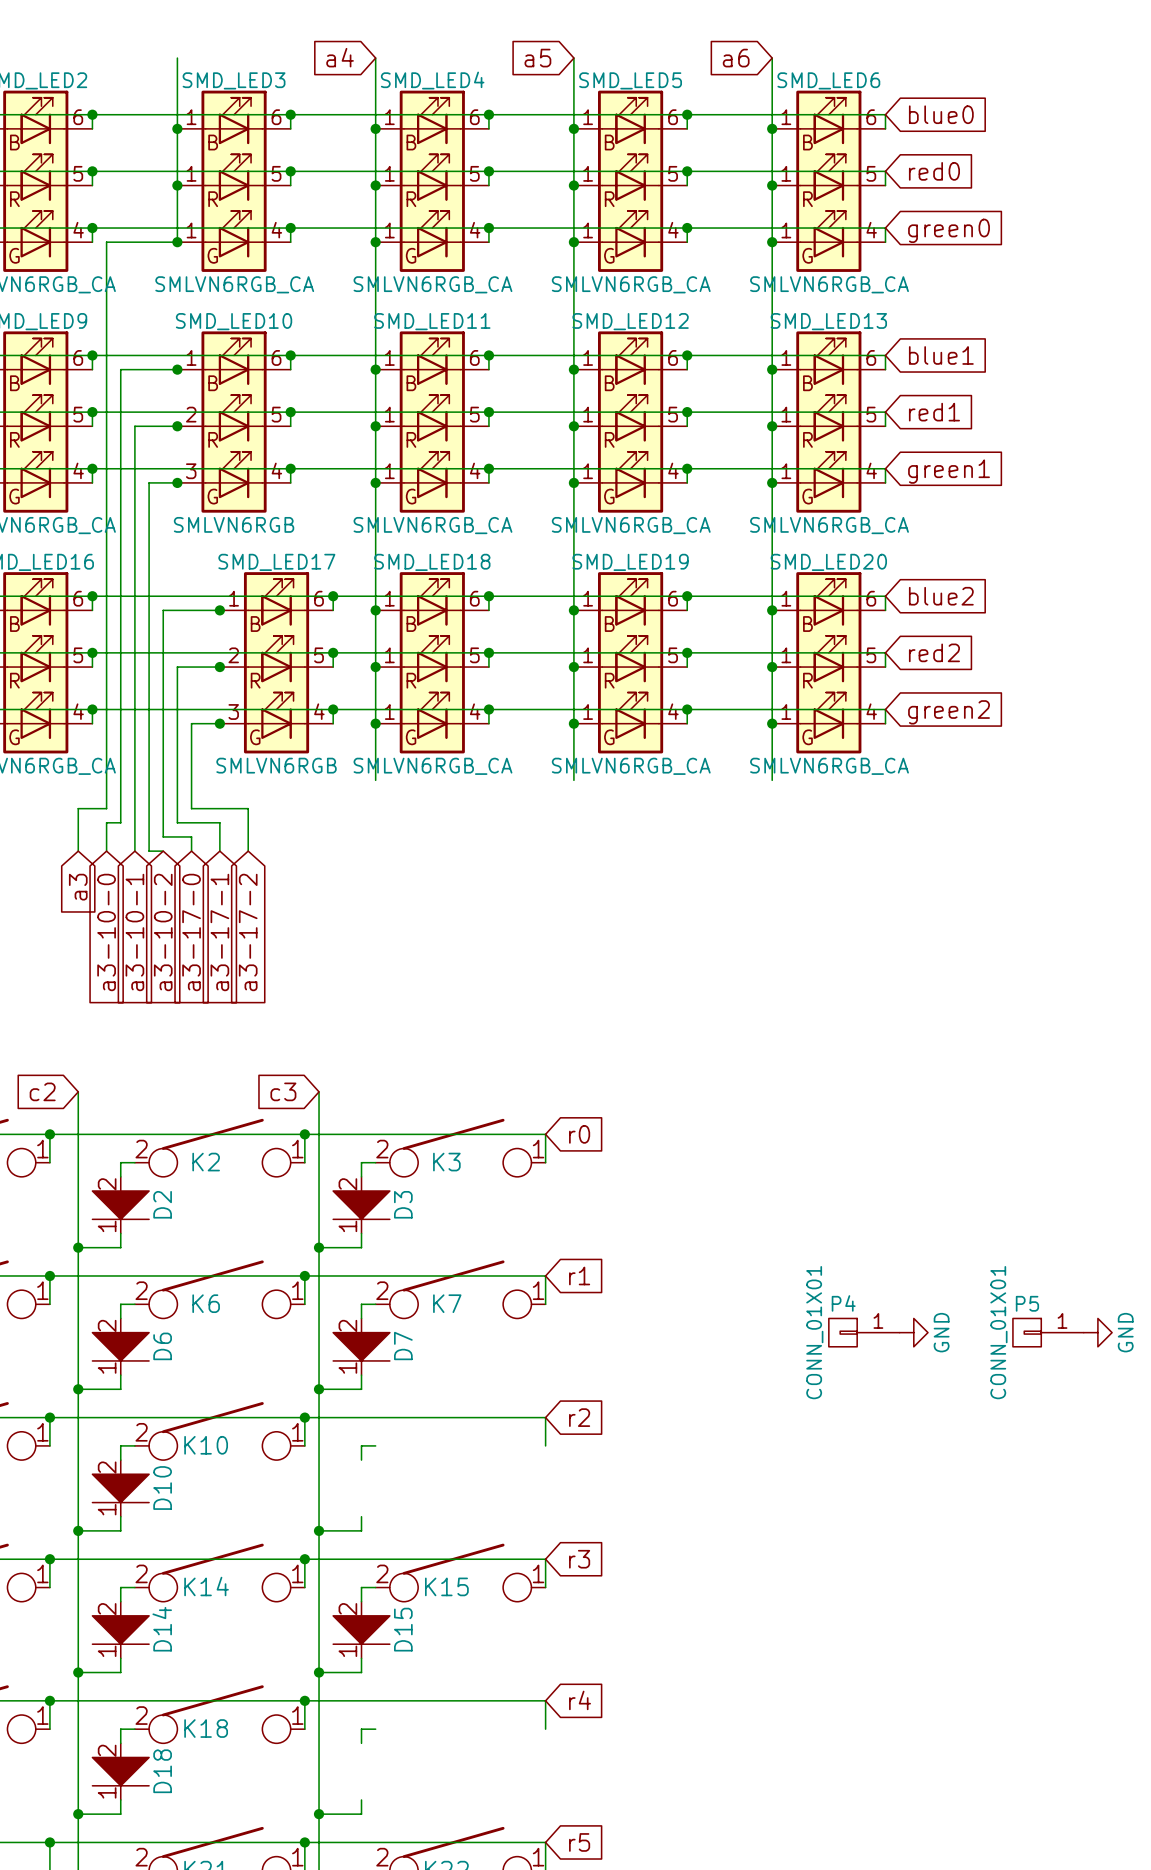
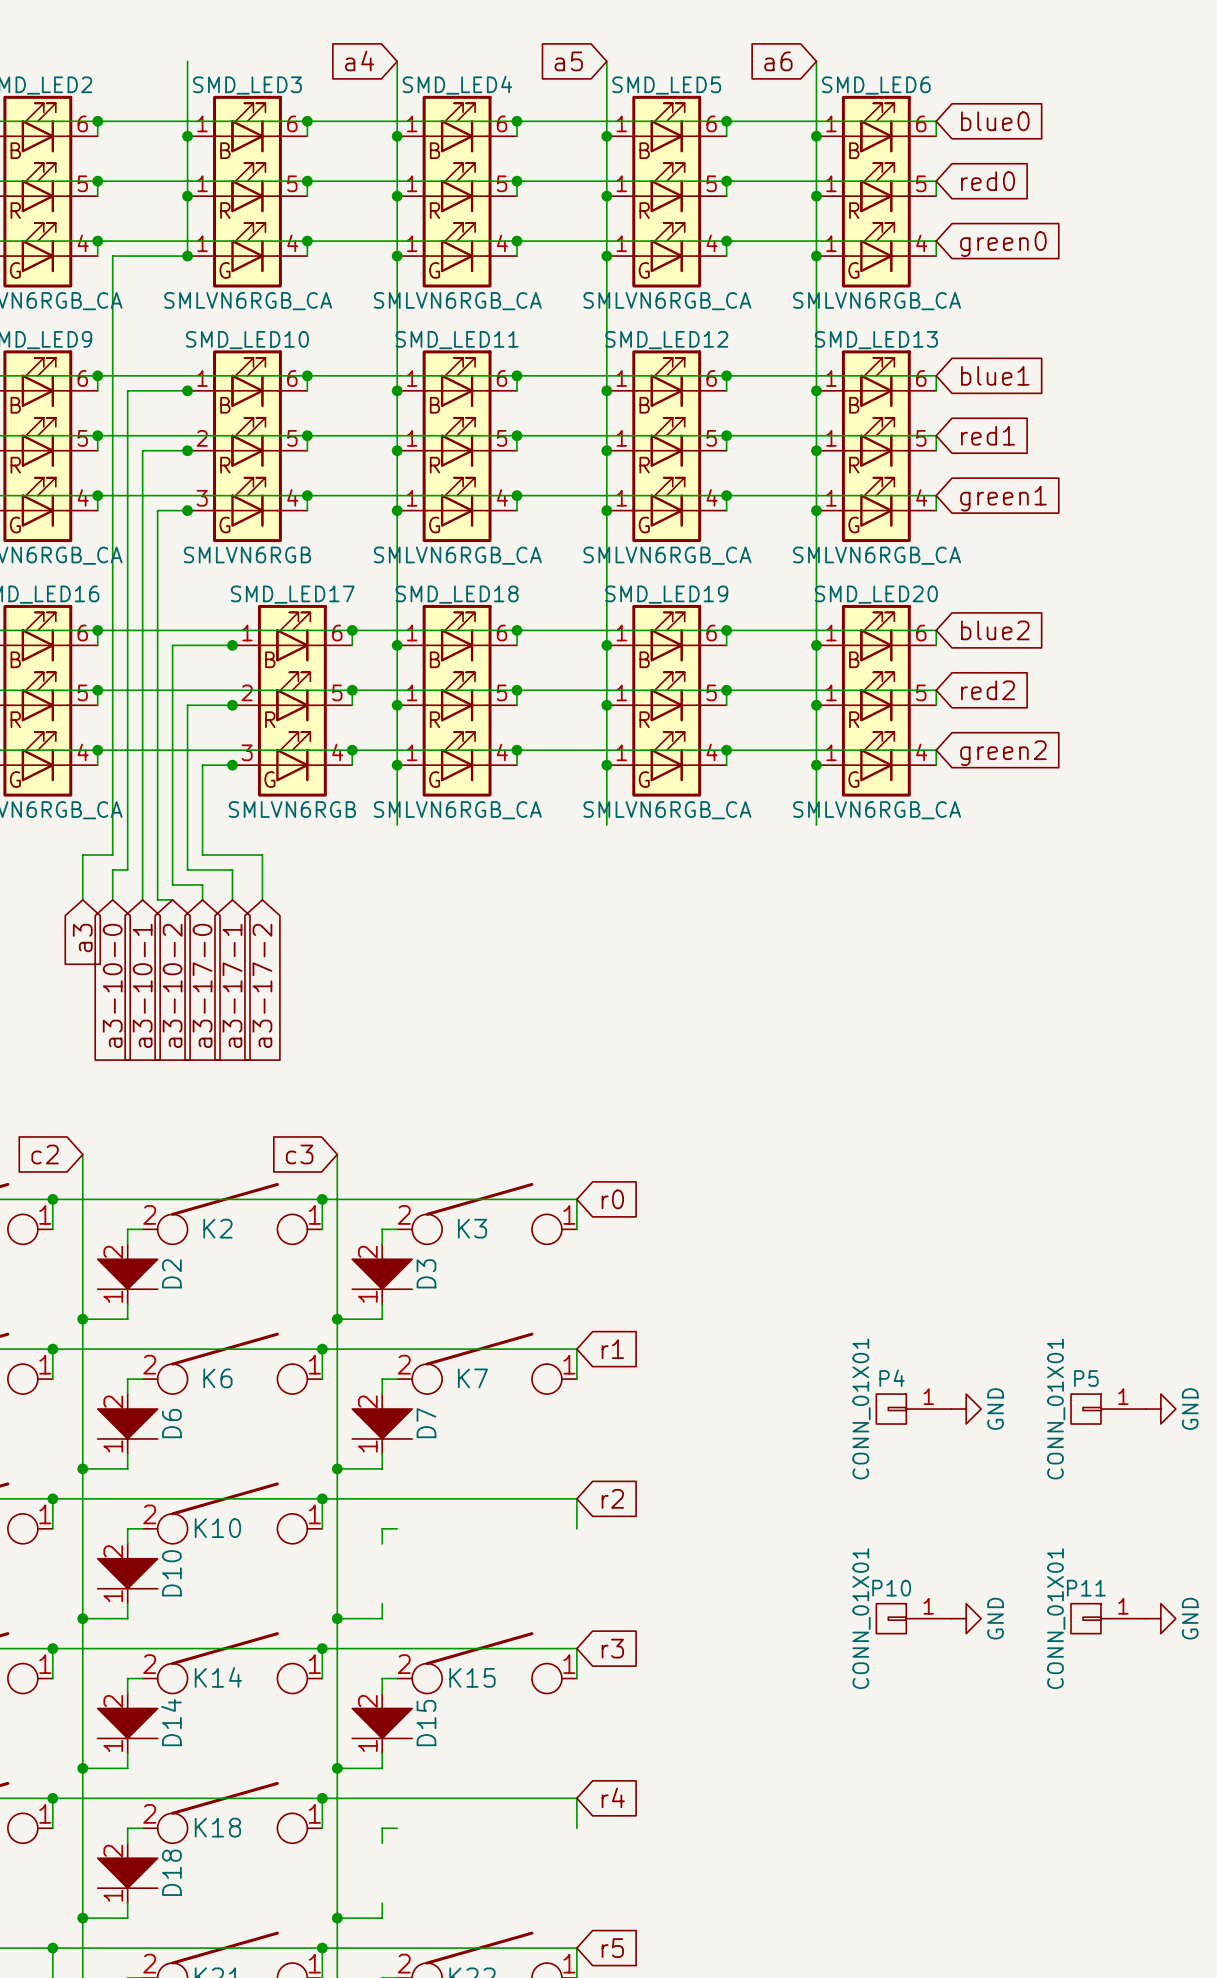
P10: none -> CONN_01X01 (913, 1618)
power symbol: none -> GND (966, 1618)
P11: none -> CONN_01X01 (1108, 1618)
power symbol: none -> GND (1160, 1618)

